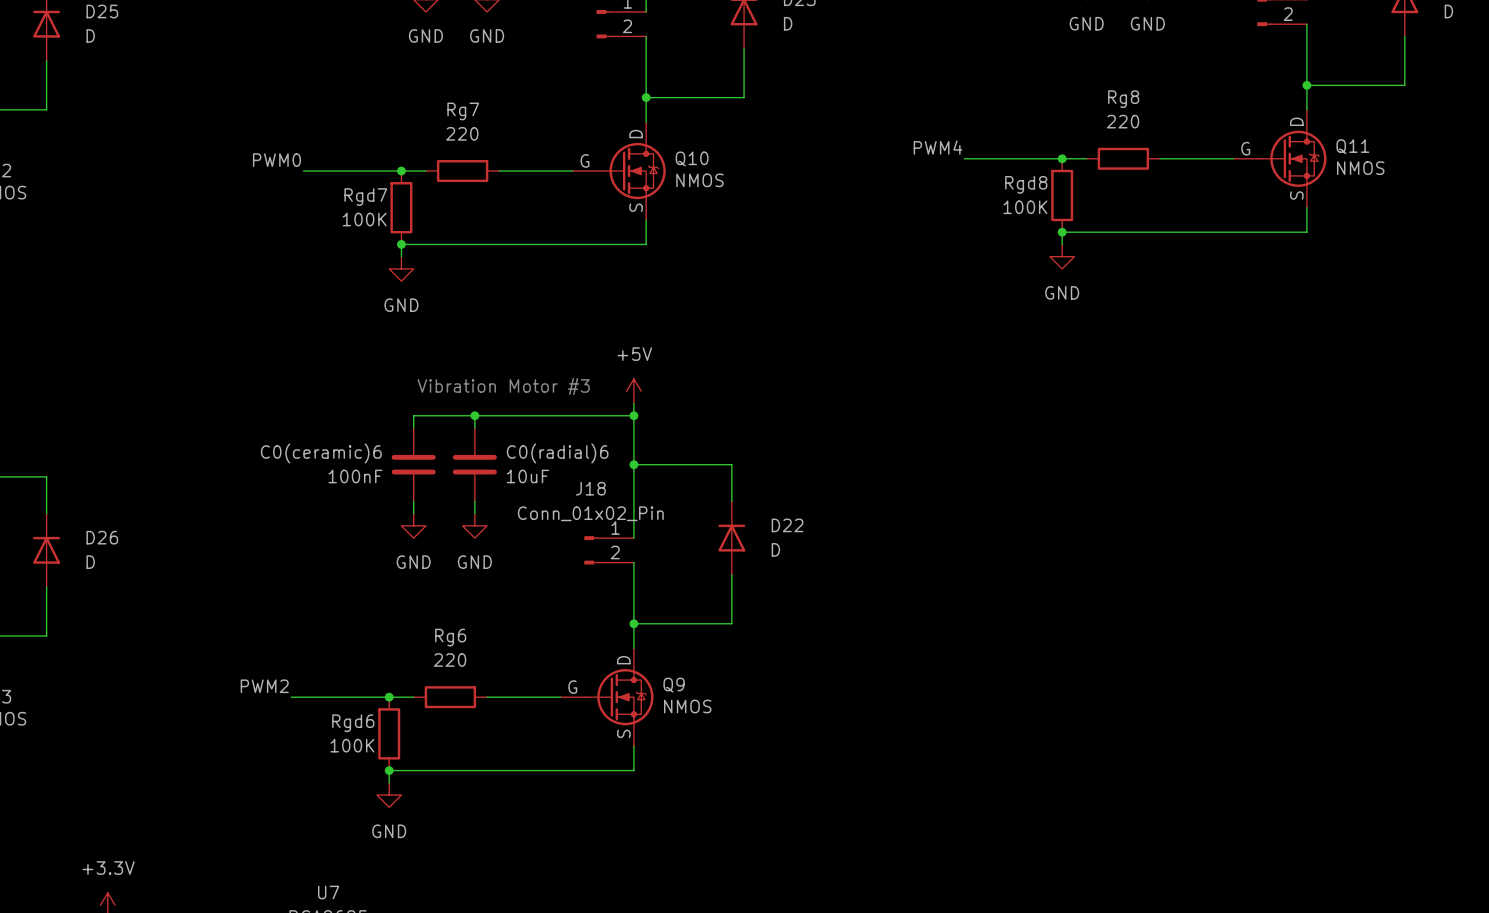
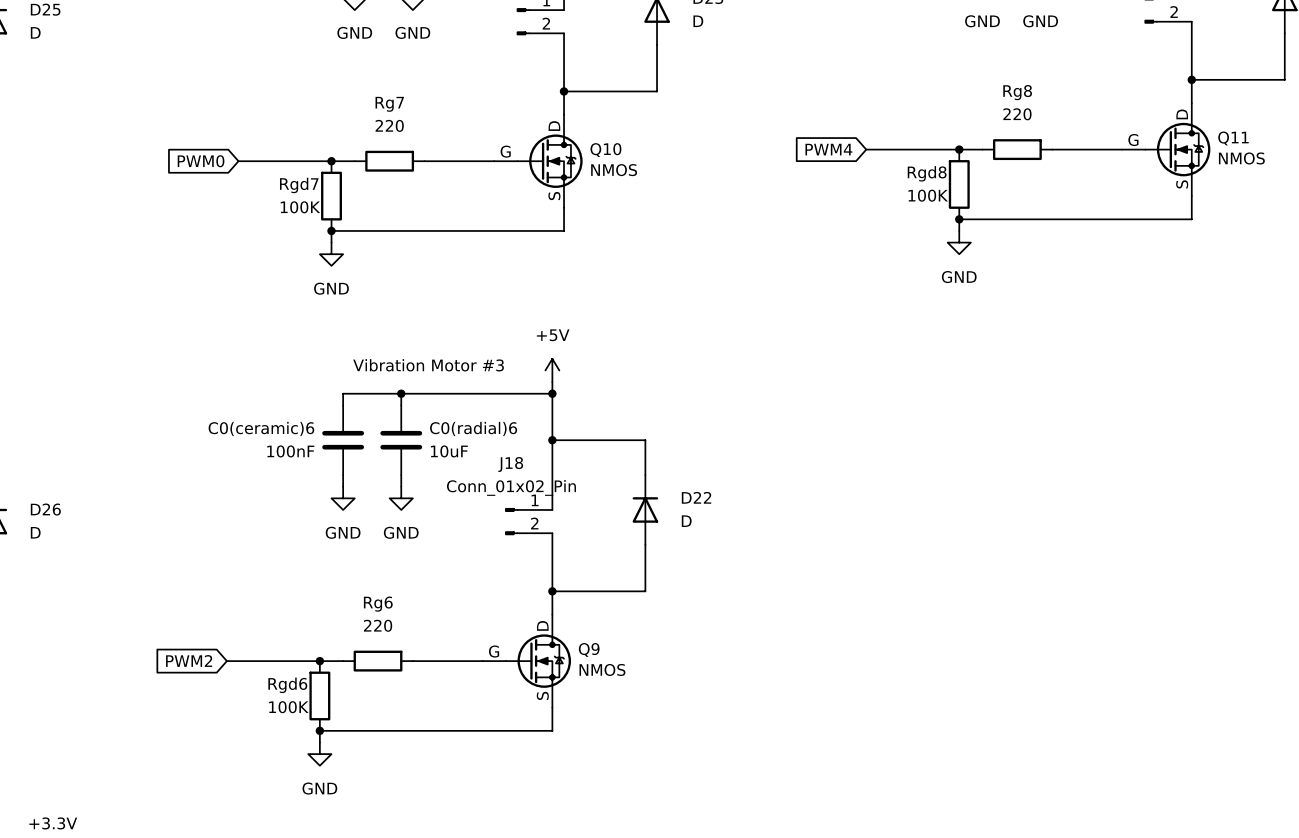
label: PWM4 (937, 147) -> none
global label: none -> PWM4 (828, 149)
label: PWM0 (276, 160) -> none
global label: none -> PWM0 (201, 161)
label: PWM2 (264, 686) -> none
global label: none -> PWM2 (189, 661)

